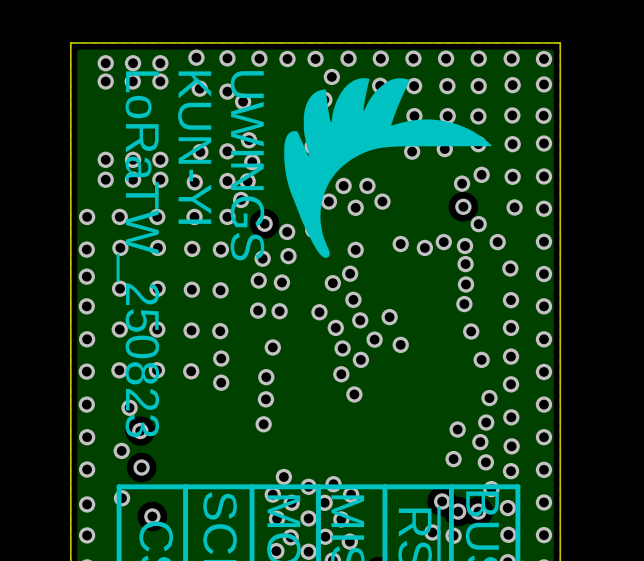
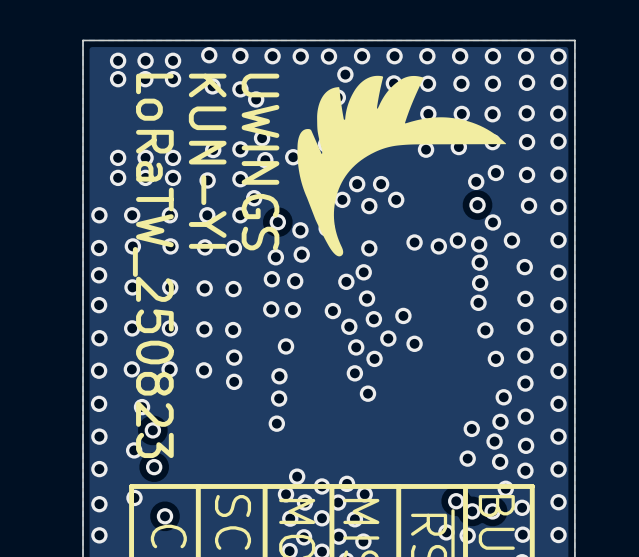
via position: (247, 181) -> (293, 157)

